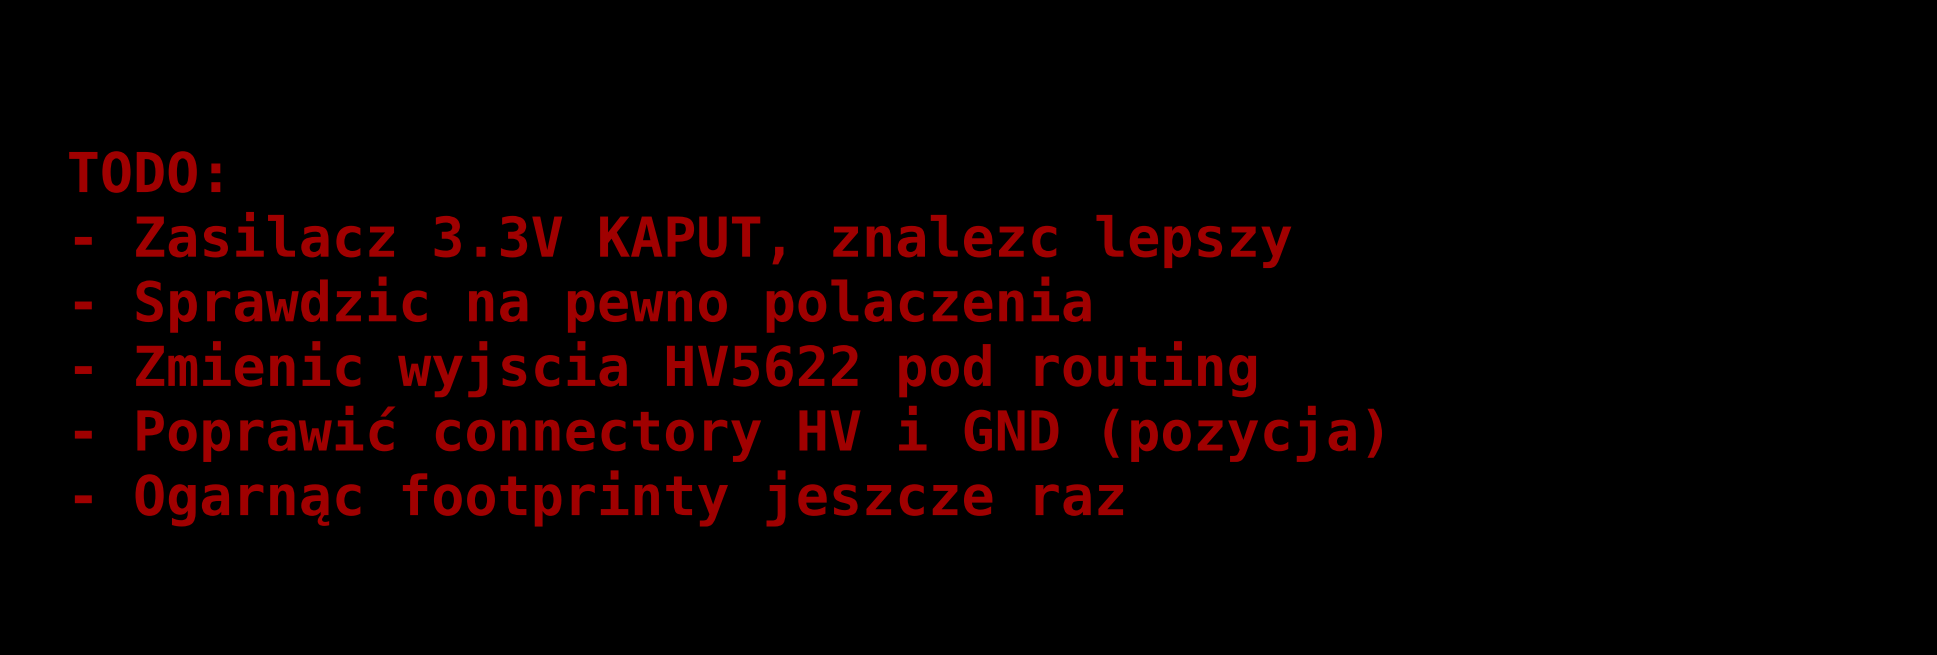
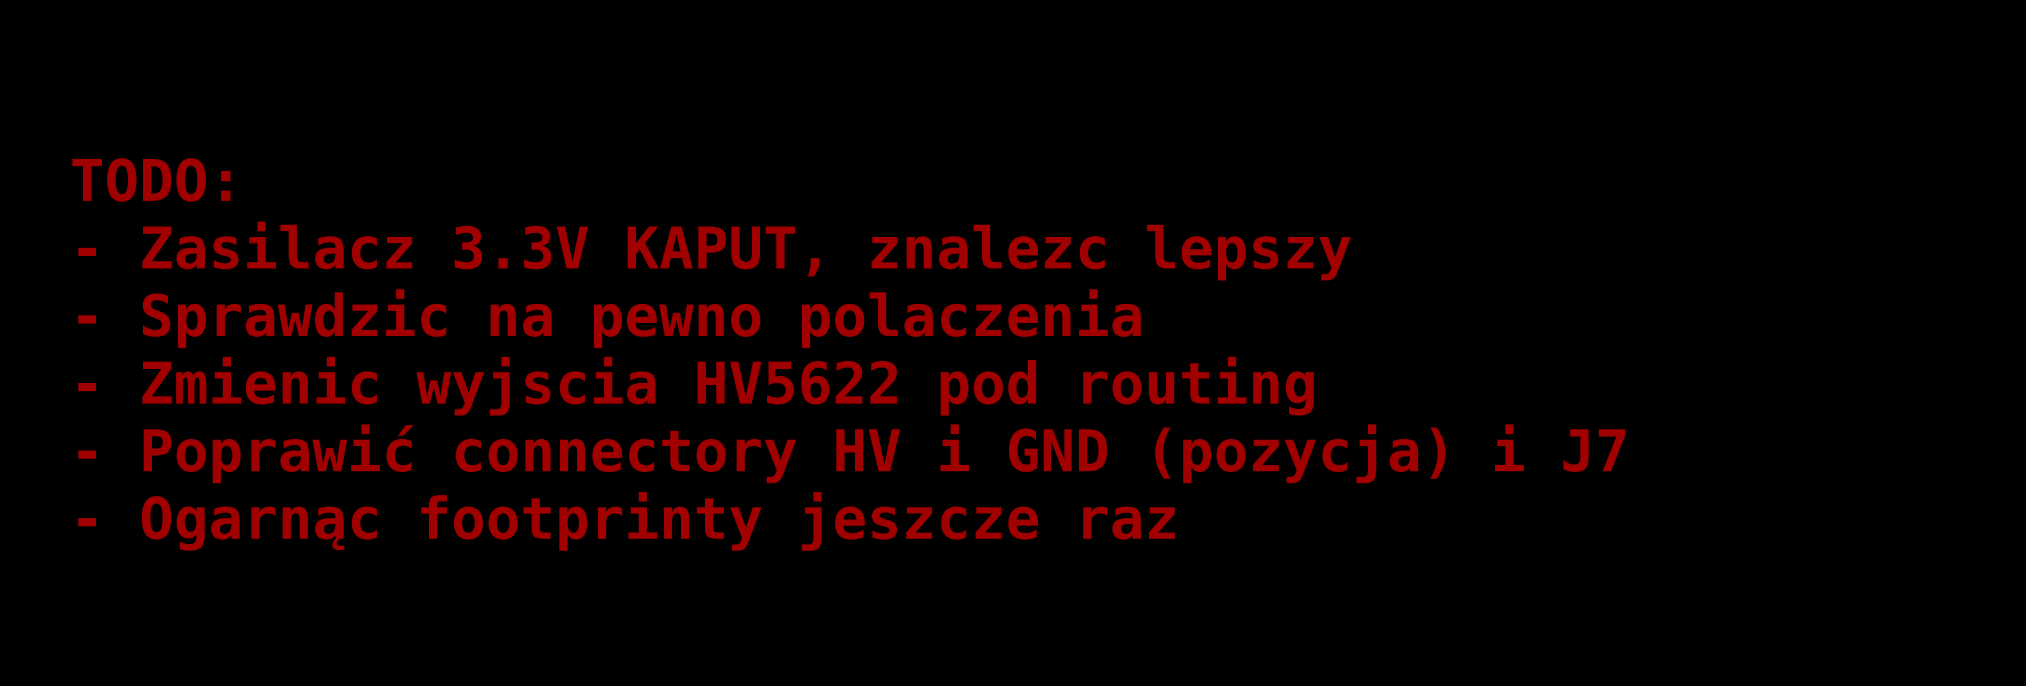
text: - Poprawić connectory HV i GND (pozycja) (728, 433) -> - Poprawić connectory HV i GND (pozycja) i J7 (851, 453)

